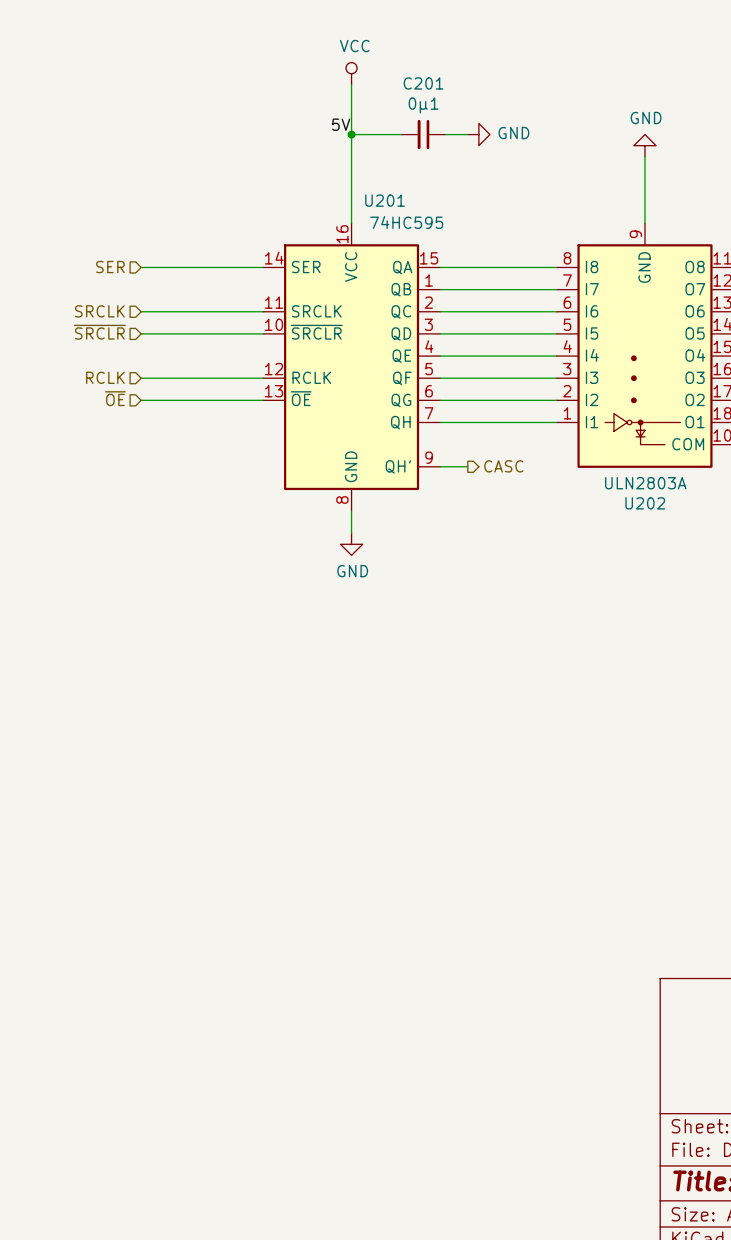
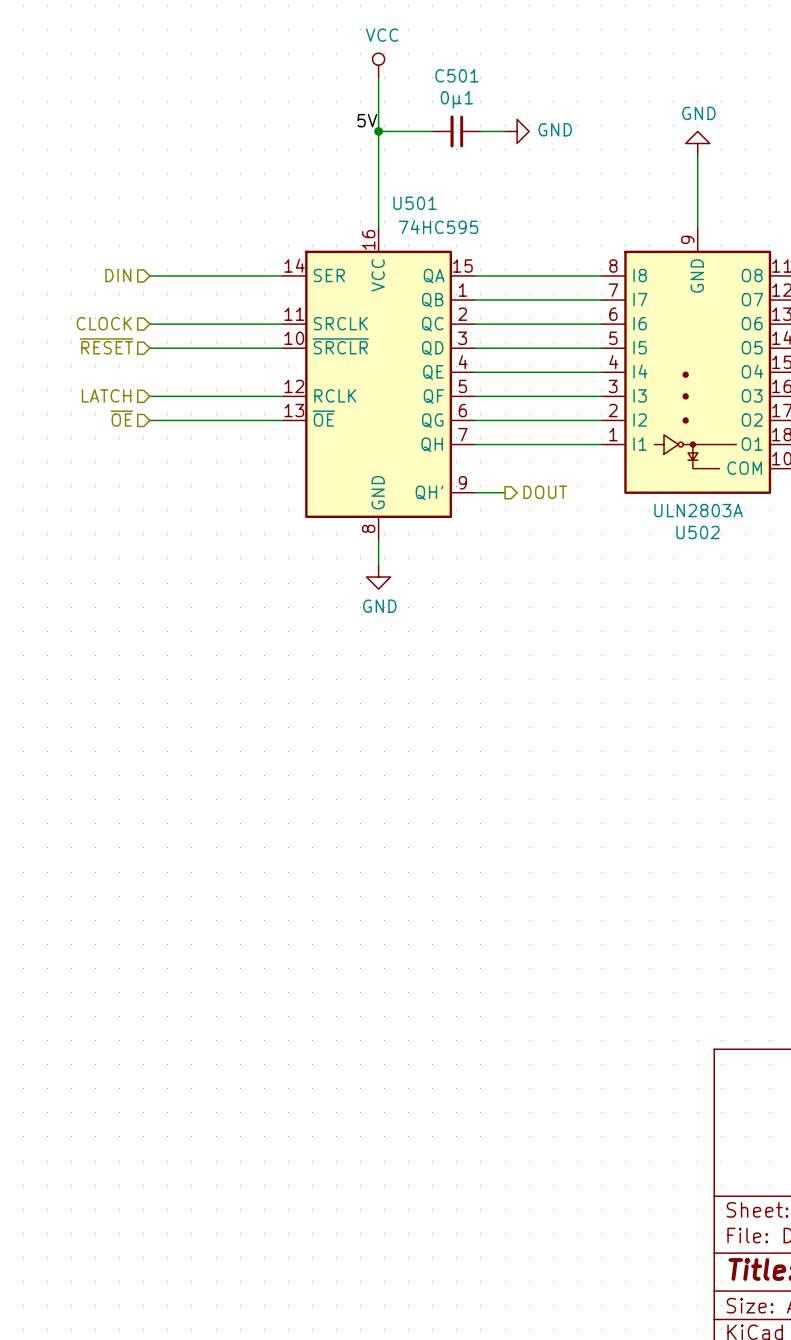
C201 name: C201 (423, 83) -> C501 (456, 75)
U201 name: U201 (385, 200) -> U501 (415, 203)
hierarchical label: SER (110, 267) -> DIN (118, 275)
hierarchical label: SRCLK (99, 311) -> CLOCK (104, 323)
hierarchical label: ~{SRCLR} (99, 332) -> ~{RESET} (106, 346)
hierarchical label: RCLK (105, 377) -> LATCH (106, 395)
hierarchical label: CASC (503, 466) -> DOUT (545, 492)
U202 name: U202 (645, 503) -> U502 (698, 532)

